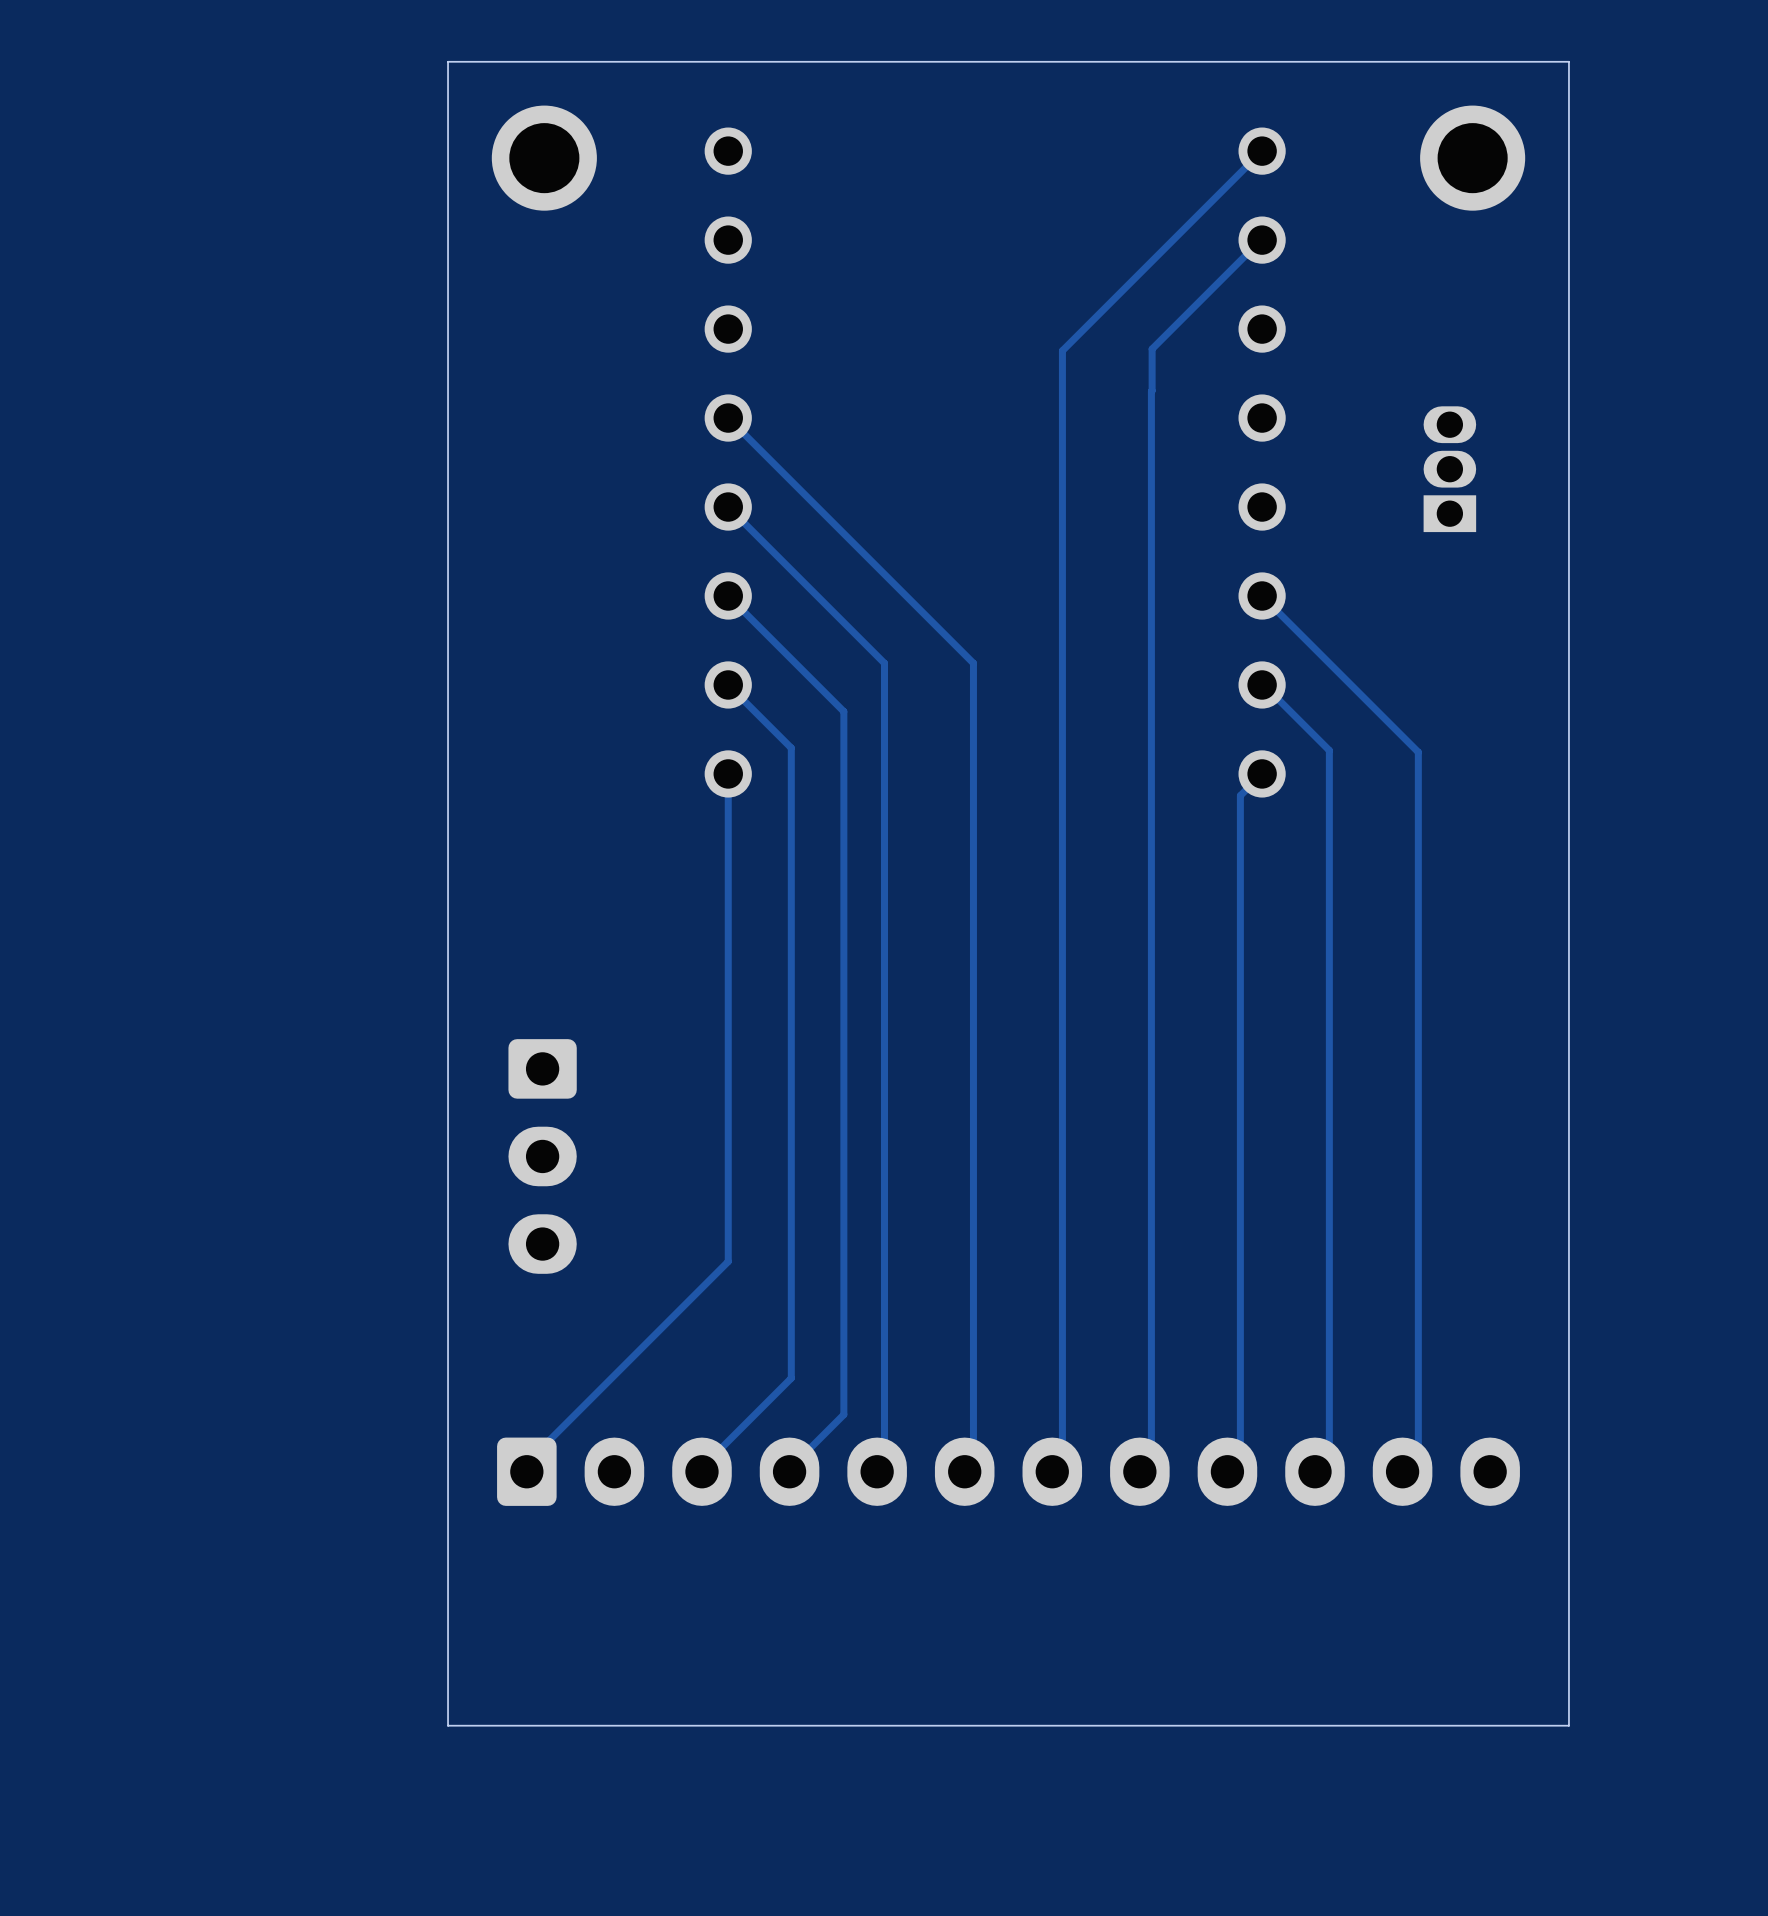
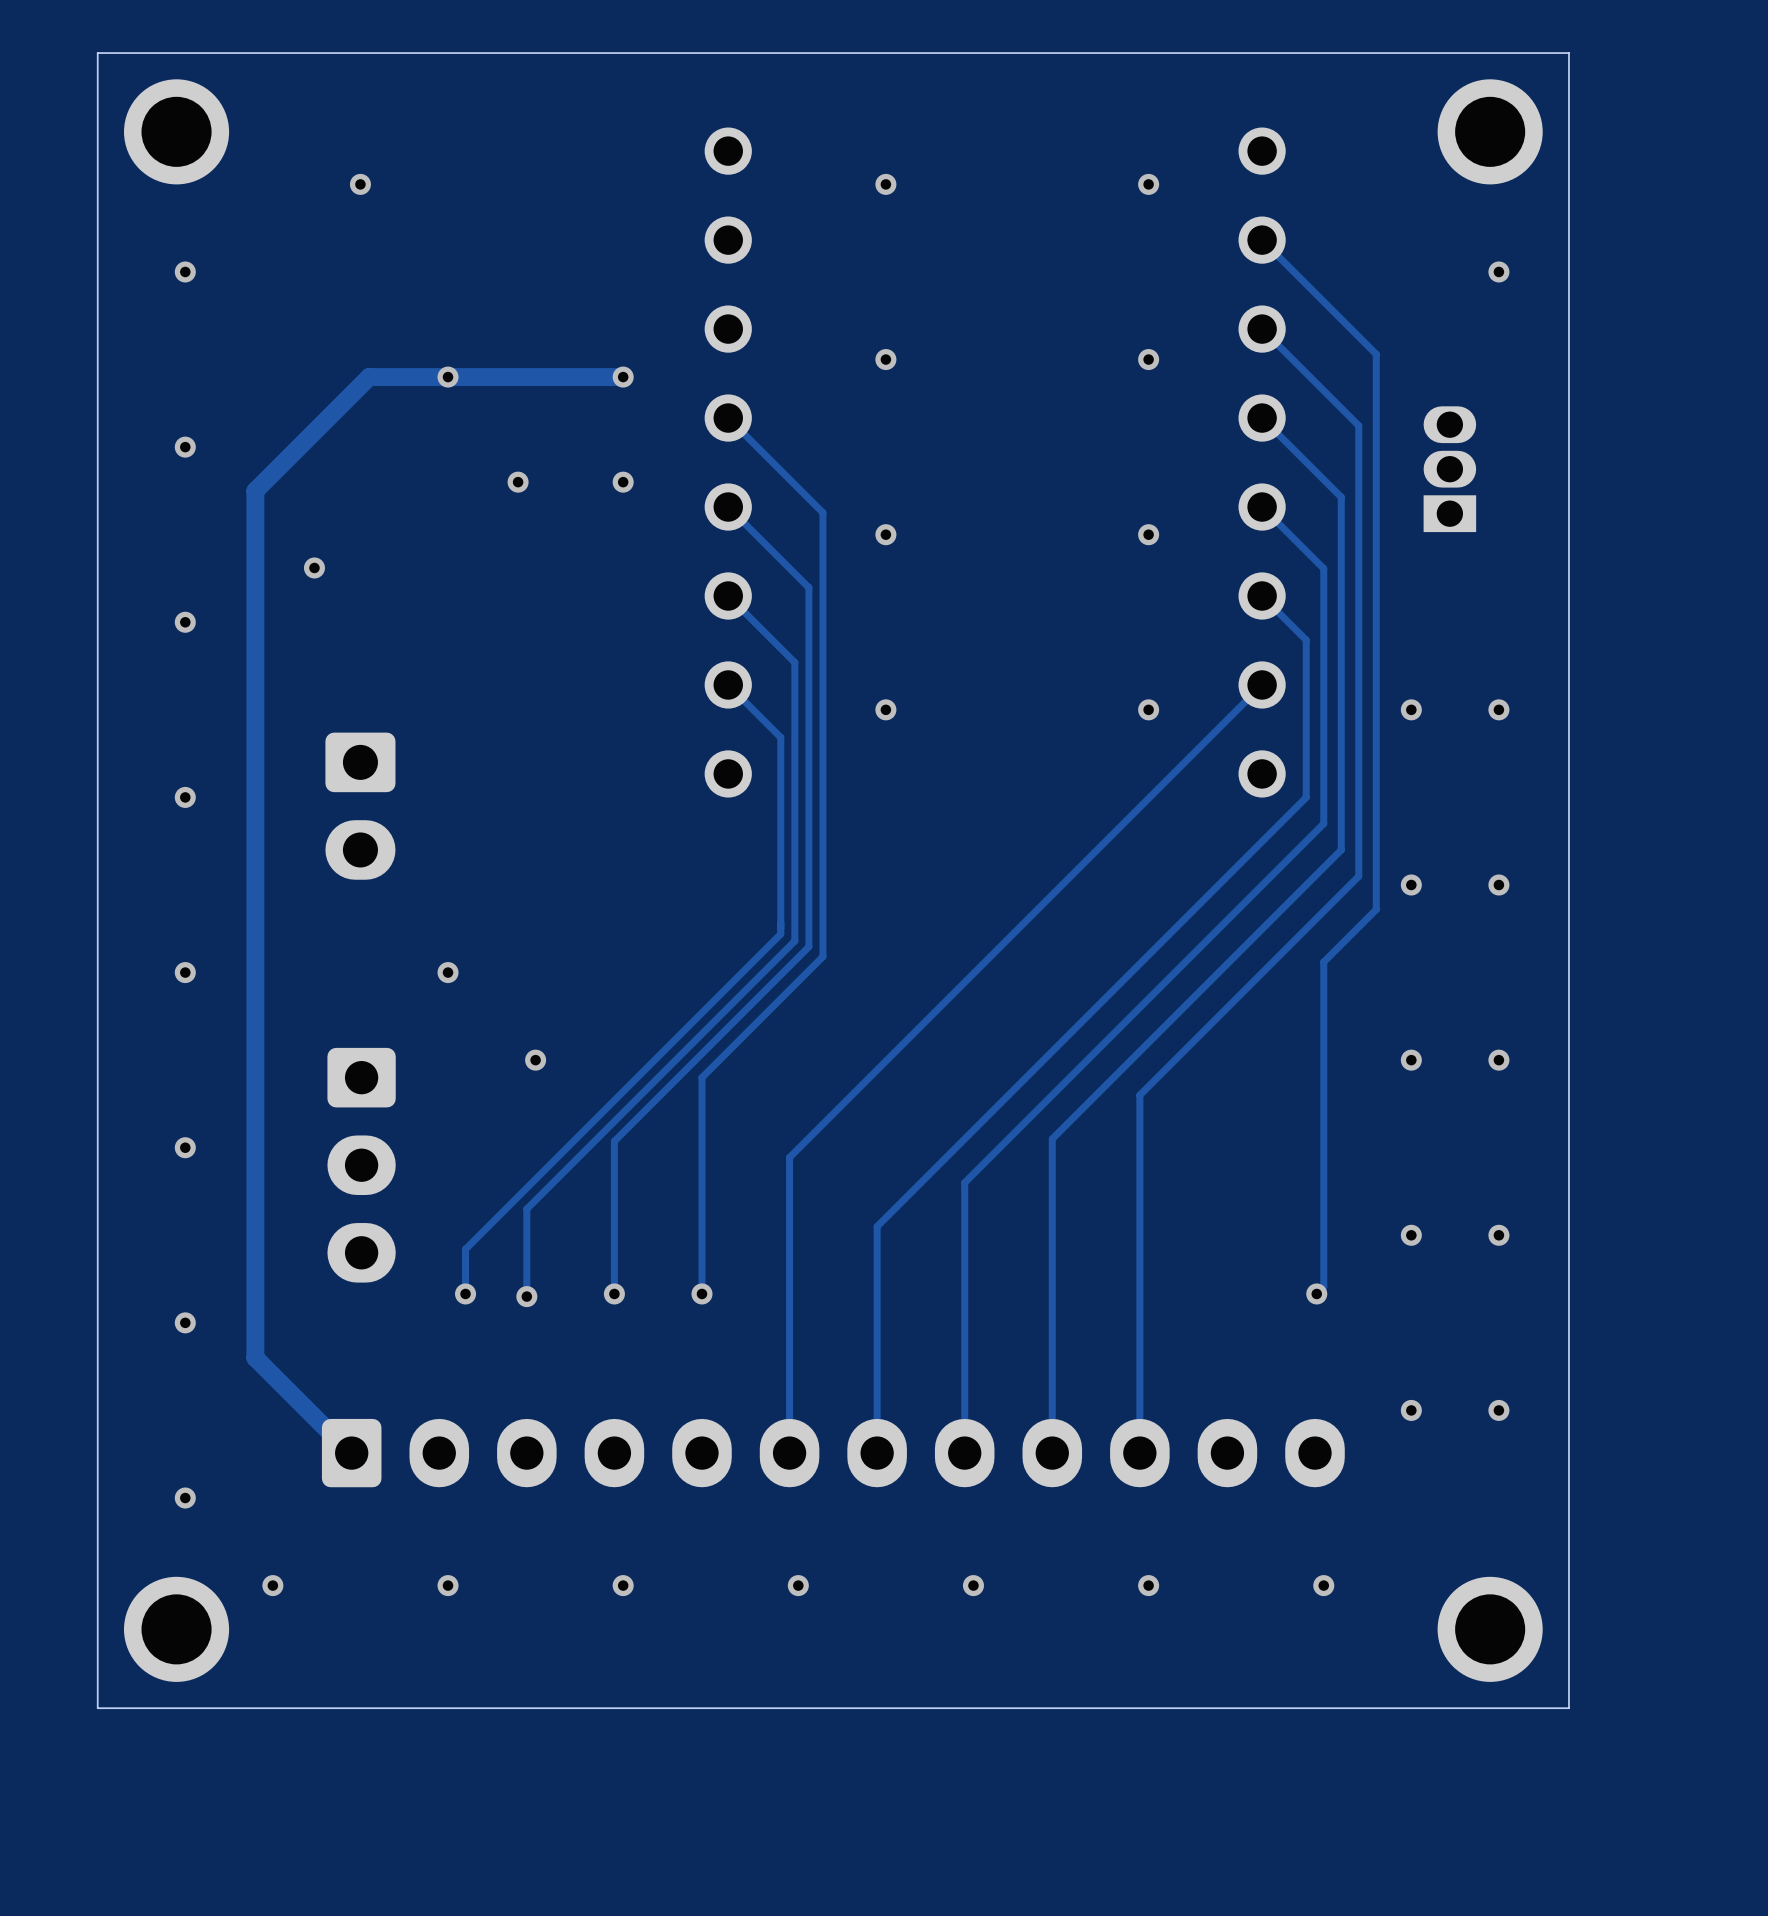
board edge: (1568, 61) (448, 61) (448, 1725) (1568, 1725) (1568, 1708) -> (1568, 61) (1568, 53) (97, 53) (97, 1708) (1568, 1708)
track: (1262, 151) (1062, 350) (1062, 1462) -> none
part position: (544, 158) -> (176, 131)
part position: (1472, 158) -> (1490, 131)
via: none -> (360, 184)
via: none -> (885, 184)
via: none -> (1148, 184)
track: (1261, 240) (1152, 349) (1151, 1462) -> (1262, 240) (1376, 354) (1376, 909) (1323, 962) (1323, 1286) (1316, 1293)
via: none -> (185, 271)
via: none -> (1498, 271)
track: none -> (1262, 329) (1358, 425) (1358, 876) (1139, 1095) (1139, 1471)
via: none -> (885, 359)
via: none -> (1148, 359)
via: none -> (448, 377)
track: none -> (623, 377) (369, 377) (255, 490) (255, 1357) (351, 1453)
via: none -> (623, 377)
track: none -> (1262, 418) (1341, 497) (1341, 849) (1052, 1138) (1052, 1453)
via: none -> (185, 447)
via: none -> (518, 482)
via: none -> (623, 482)
track: none -> (1262, 507) (1323, 568) (1323, 823) (964, 1182) (964, 1471)
track: (822, 512) (973, 663) (973, 1462) -> (822, 512) (822, 956) (701, 1077) (701, 1293)
via: none -> (885, 534)
via: none -> (1148, 534)
via: none -> (314, 567)
track: (808, 587) (884, 663) (884, 1462) -> (808, 587) (808, 946) (614, 1141) (614, 1293)
via: none -> (185, 622)
track: (1306, 640) (1418, 752) (1418, 1462) -> (1306, 640) (1306, 797) (877, 1226) (877, 1453)
track: (794, 662) (843, 711) (843, 1414) (795, 1462) -> (794, 662) (794, 941) (526, 1209) (526, 1296)
track: none -> (1262, 684) (789, 1157) (789, 1471)
track: (1263, 684) (1329, 750) (1329, 1462) -> none
via: none -> (885, 709)
via: none -> (1148, 709)
via: none -> (1411, 709)
via: none -> (1498, 709)
track: (780, 737) (791, 748) (791, 1378) (706, 1462) -> (780, 737) (780, 934) (465, 1249) (465, 1293)
track: (728, 773) (728, 1261) (528, 1461) -> none
track: (1262, 773) (1240, 795) (1240, 1462) -> none
via: none -> (185, 797)
part: none -> (360, 806)
via: none -> (1411, 884)
via: none -> (1498, 884)
via: none -> (185, 972)
via: none -> (448, 972)
via: none -> (535, 1060)
via: none -> (1411, 1060)
via: none -> (1498, 1060)
via: none -> (185, 1147)
part position: (542, 1156) -> (361, 1165)
via: none -> (1411, 1235)
via: none -> (1498, 1235)
via: none -> (465, 1293)
via: none -> (614, 1293)
via: none -> (701, 1293)
via: none -> (1316, 1293)
via: none -> (526, 1296)
via: none -> (185, 1322)
via: none -> (1411, 1410)
via: none -> (1498, 1410)
part position: (1008, 1471) -> (833, 1453)
via: none -> (185, 1498)
via: none -> (272, 1585)
via: none -> (448, 1585)
via: none -> (623, 1585)
via: none -> (798, 1585)
via: none -> (973, 1585)
via: none -> (1148, 1585)
via: none -> (1323, 1585)
part: none -> (176, 1629)
part: none -> (1490, 1629)

